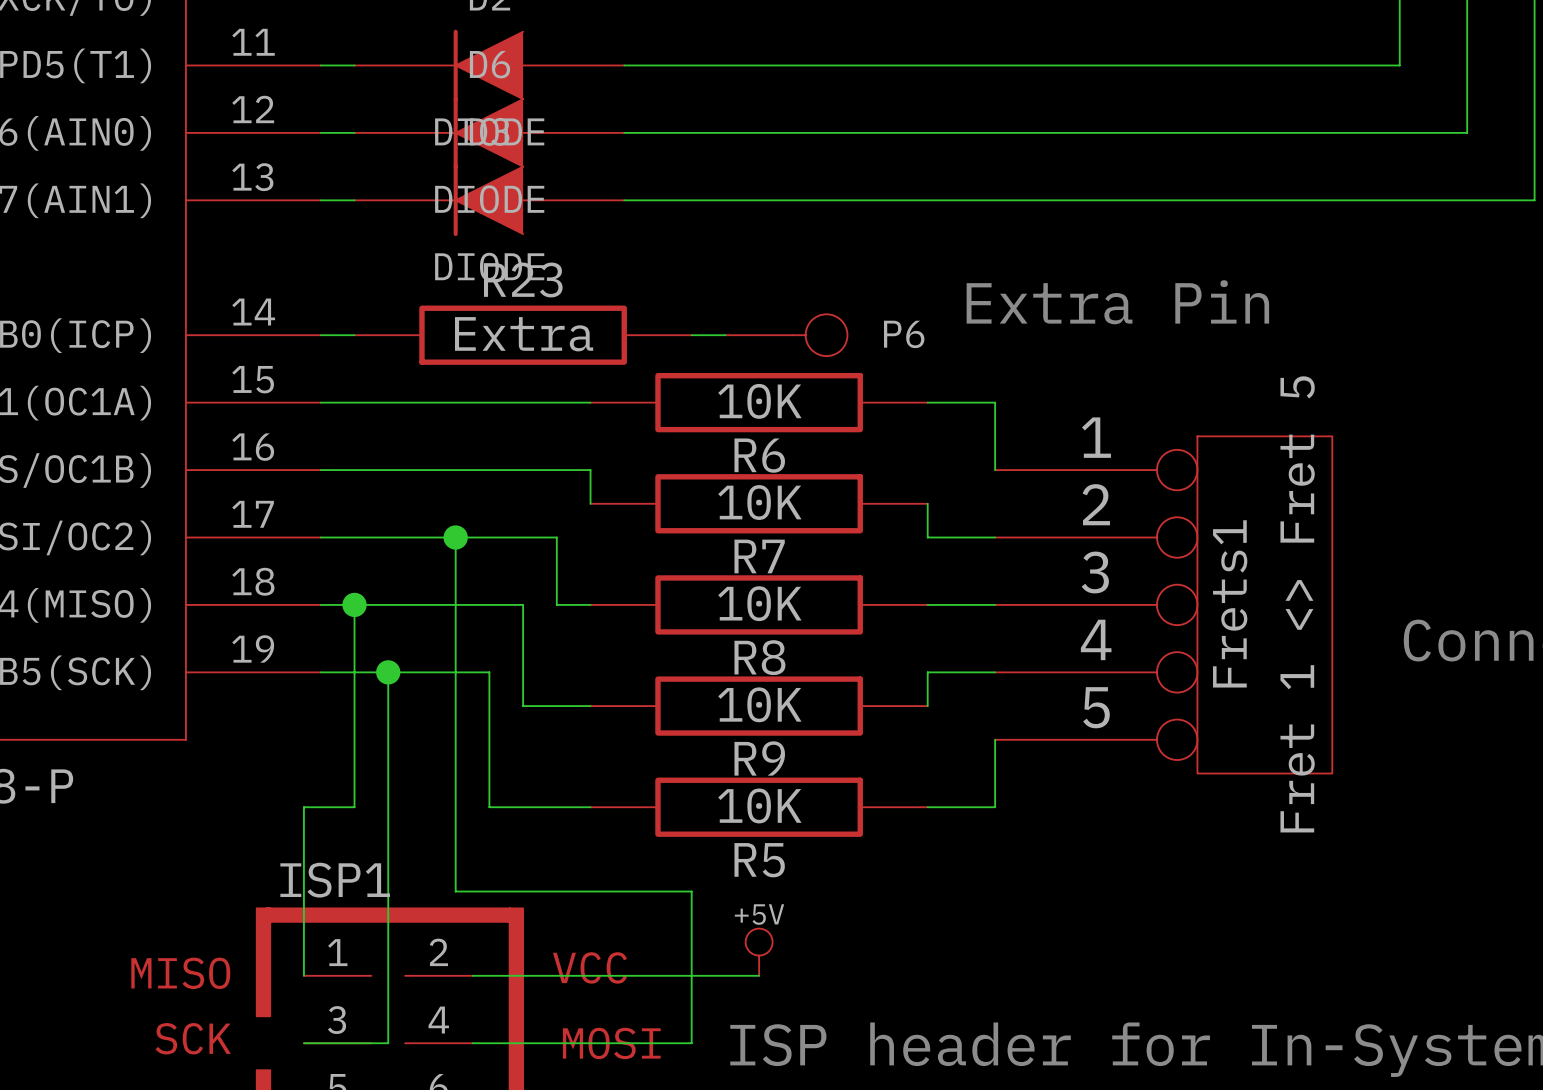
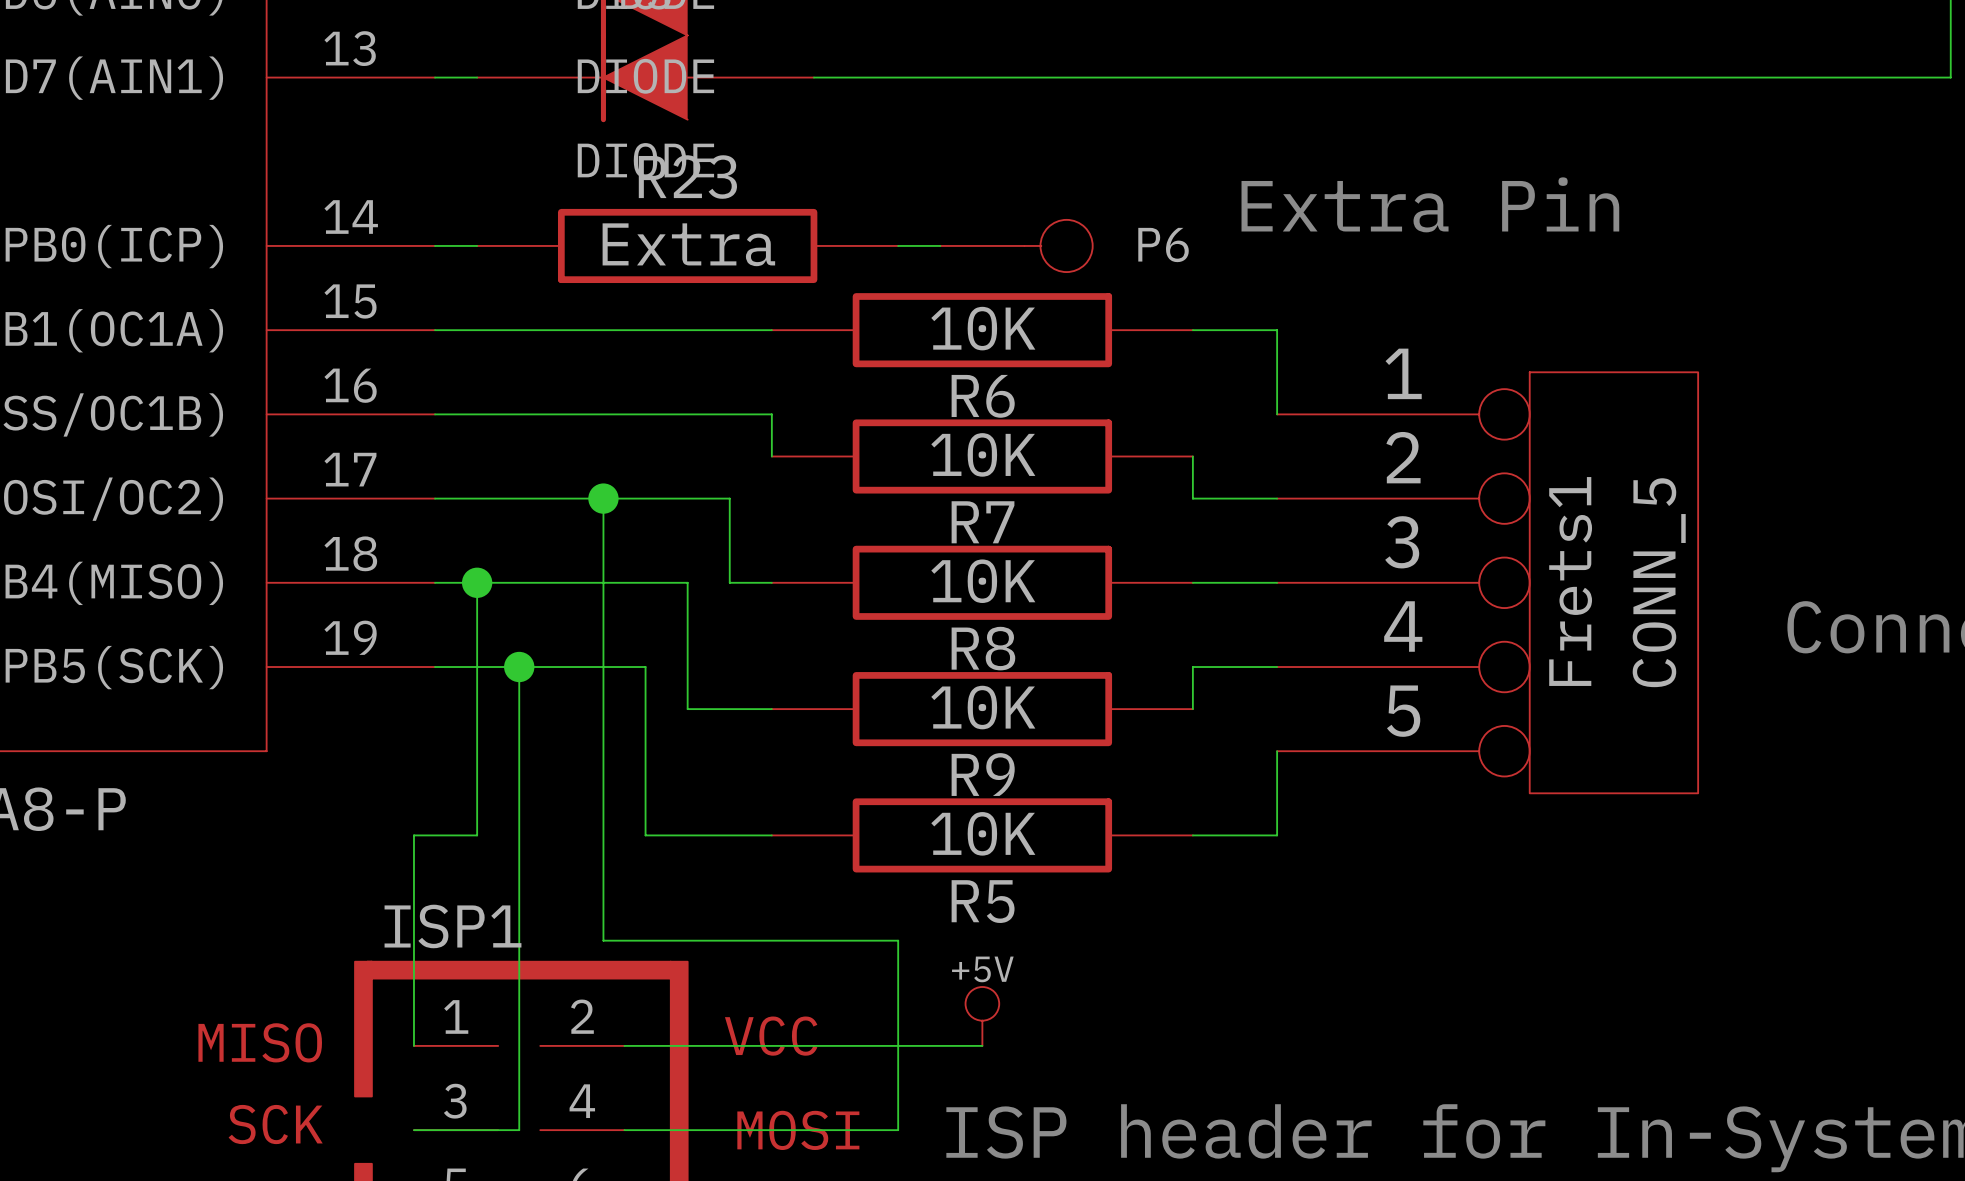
Frets1 value: Fret 1 <> Fret 5 (1297, 604) -> CONN_5 (1659, 582)

